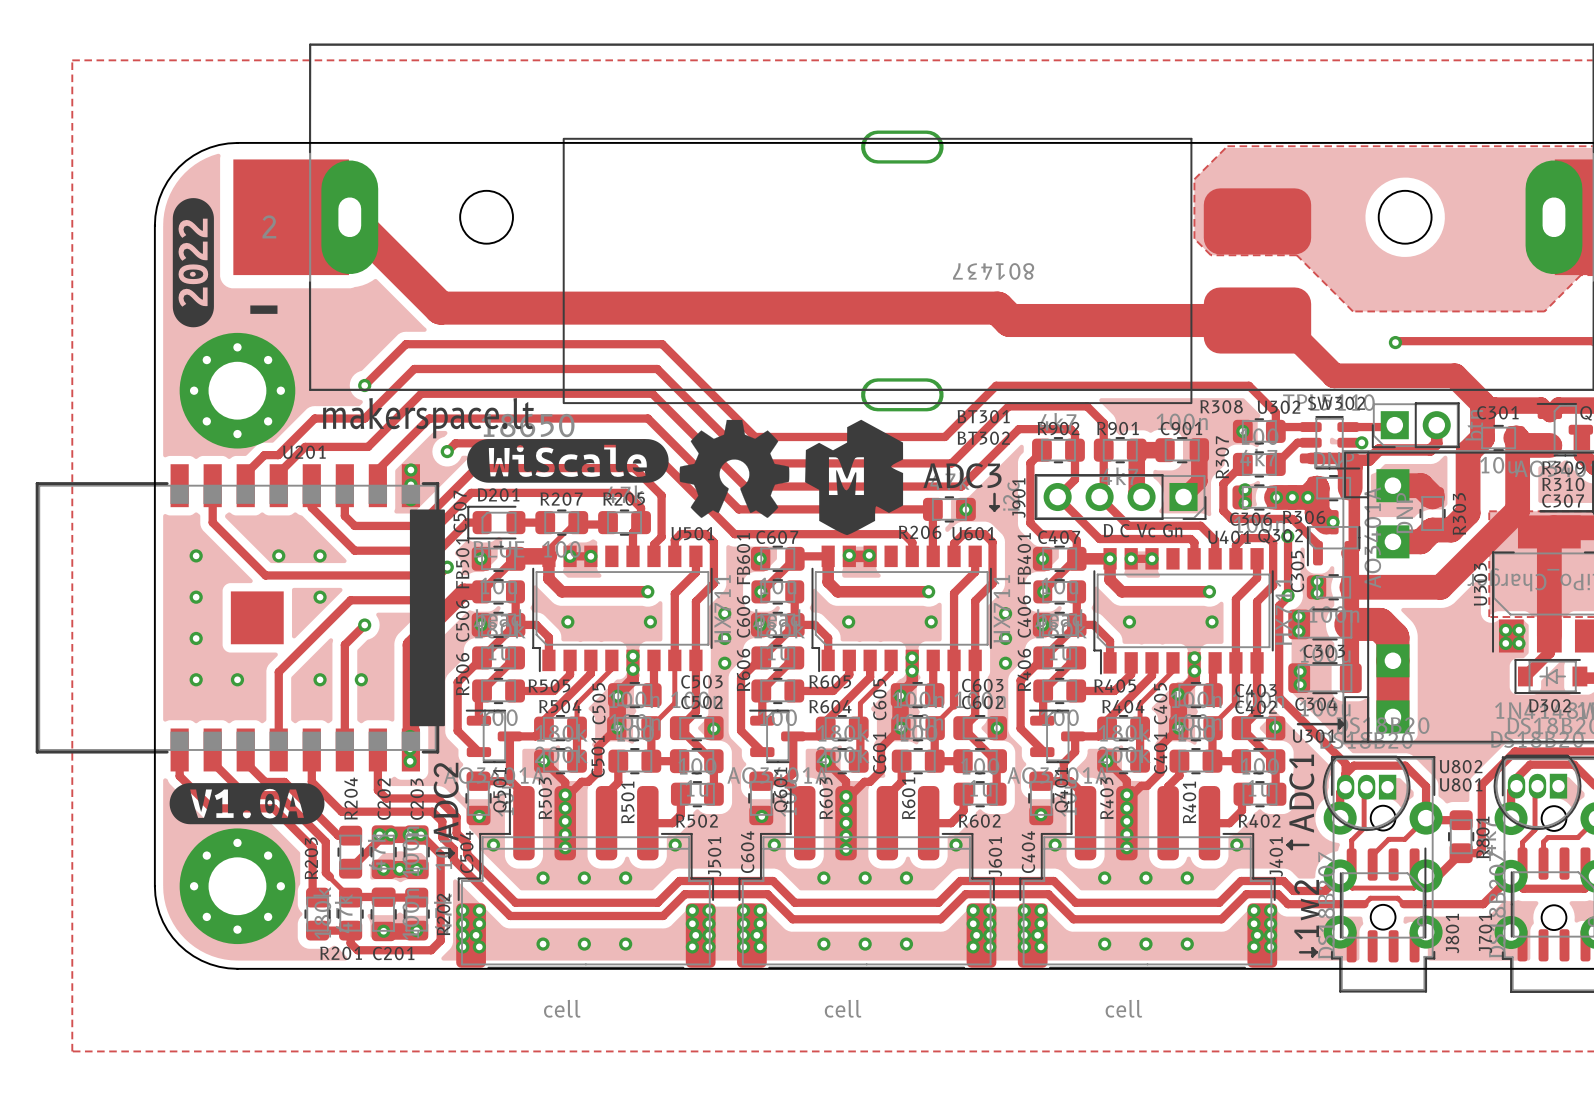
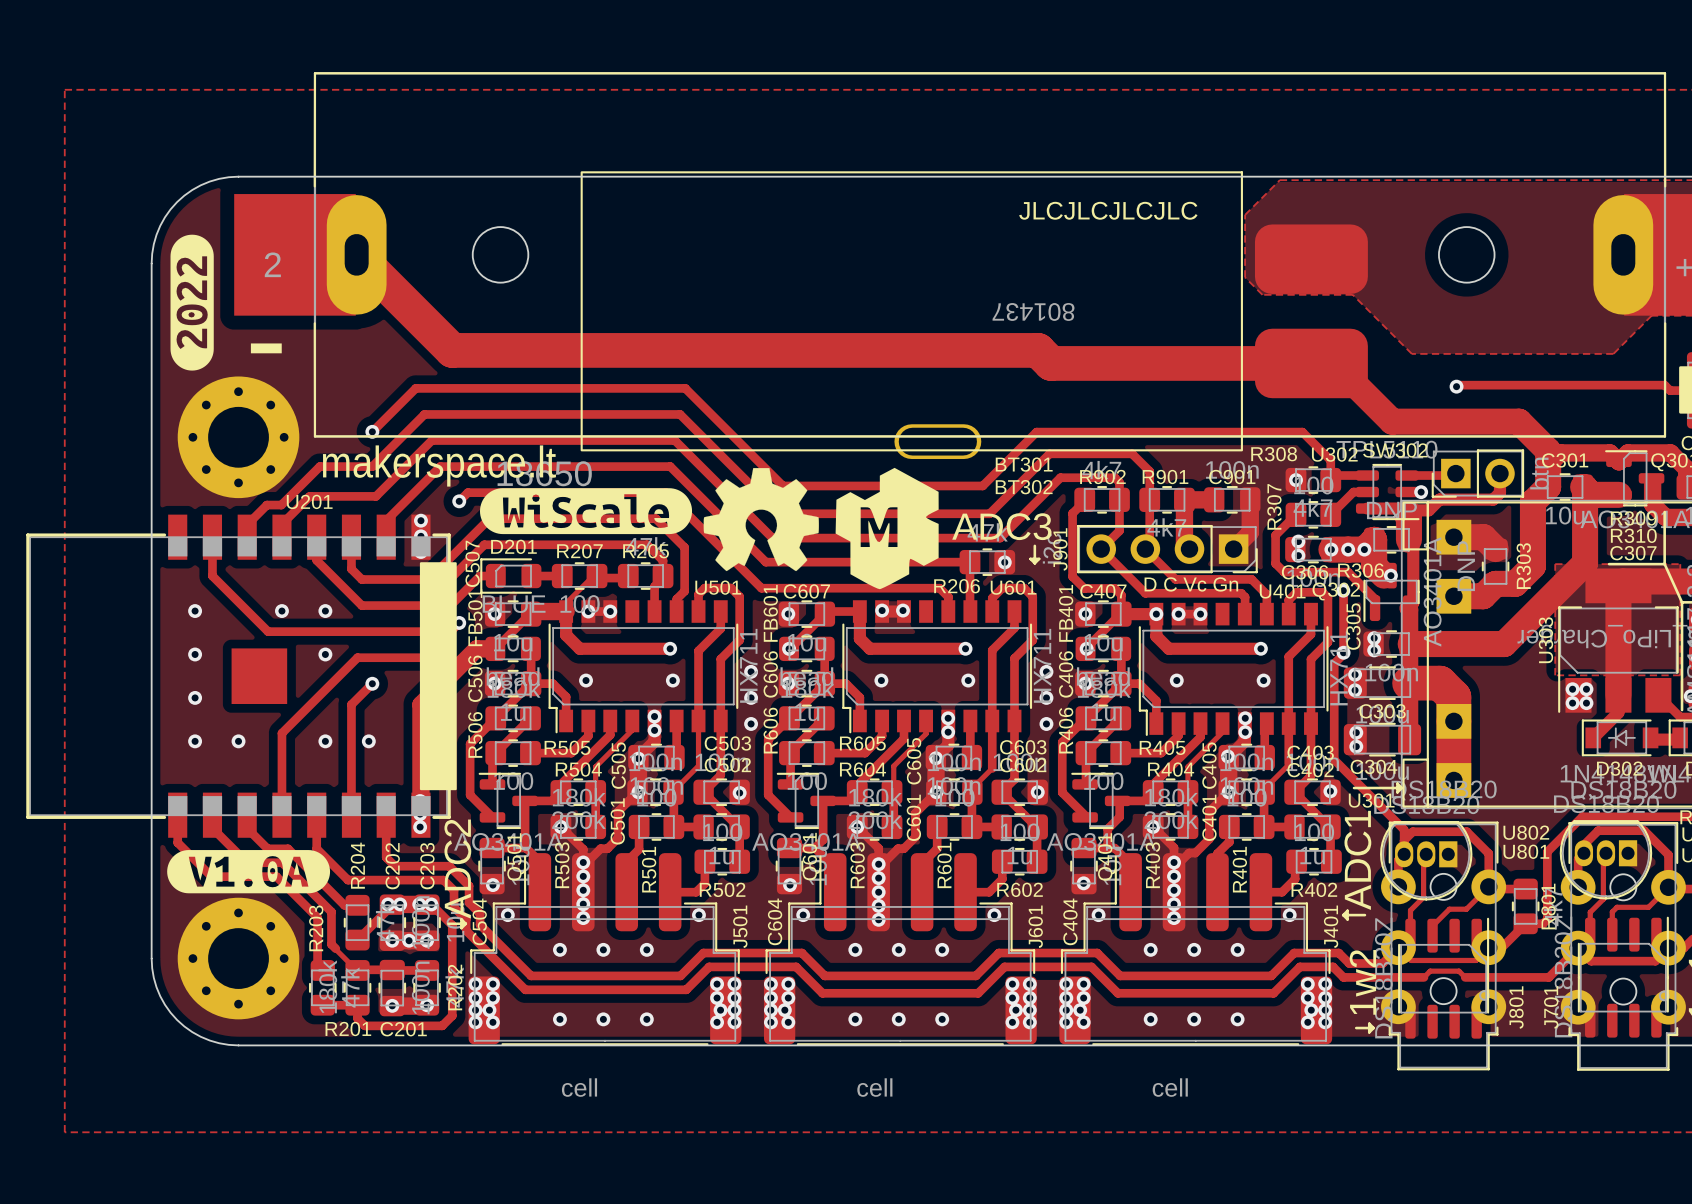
BT302 footprint: [562, 130, 1312, 412] -> [580, 167, 1368, 460]
text: none -> JLCJLCJLCJLC (1108, 210)

